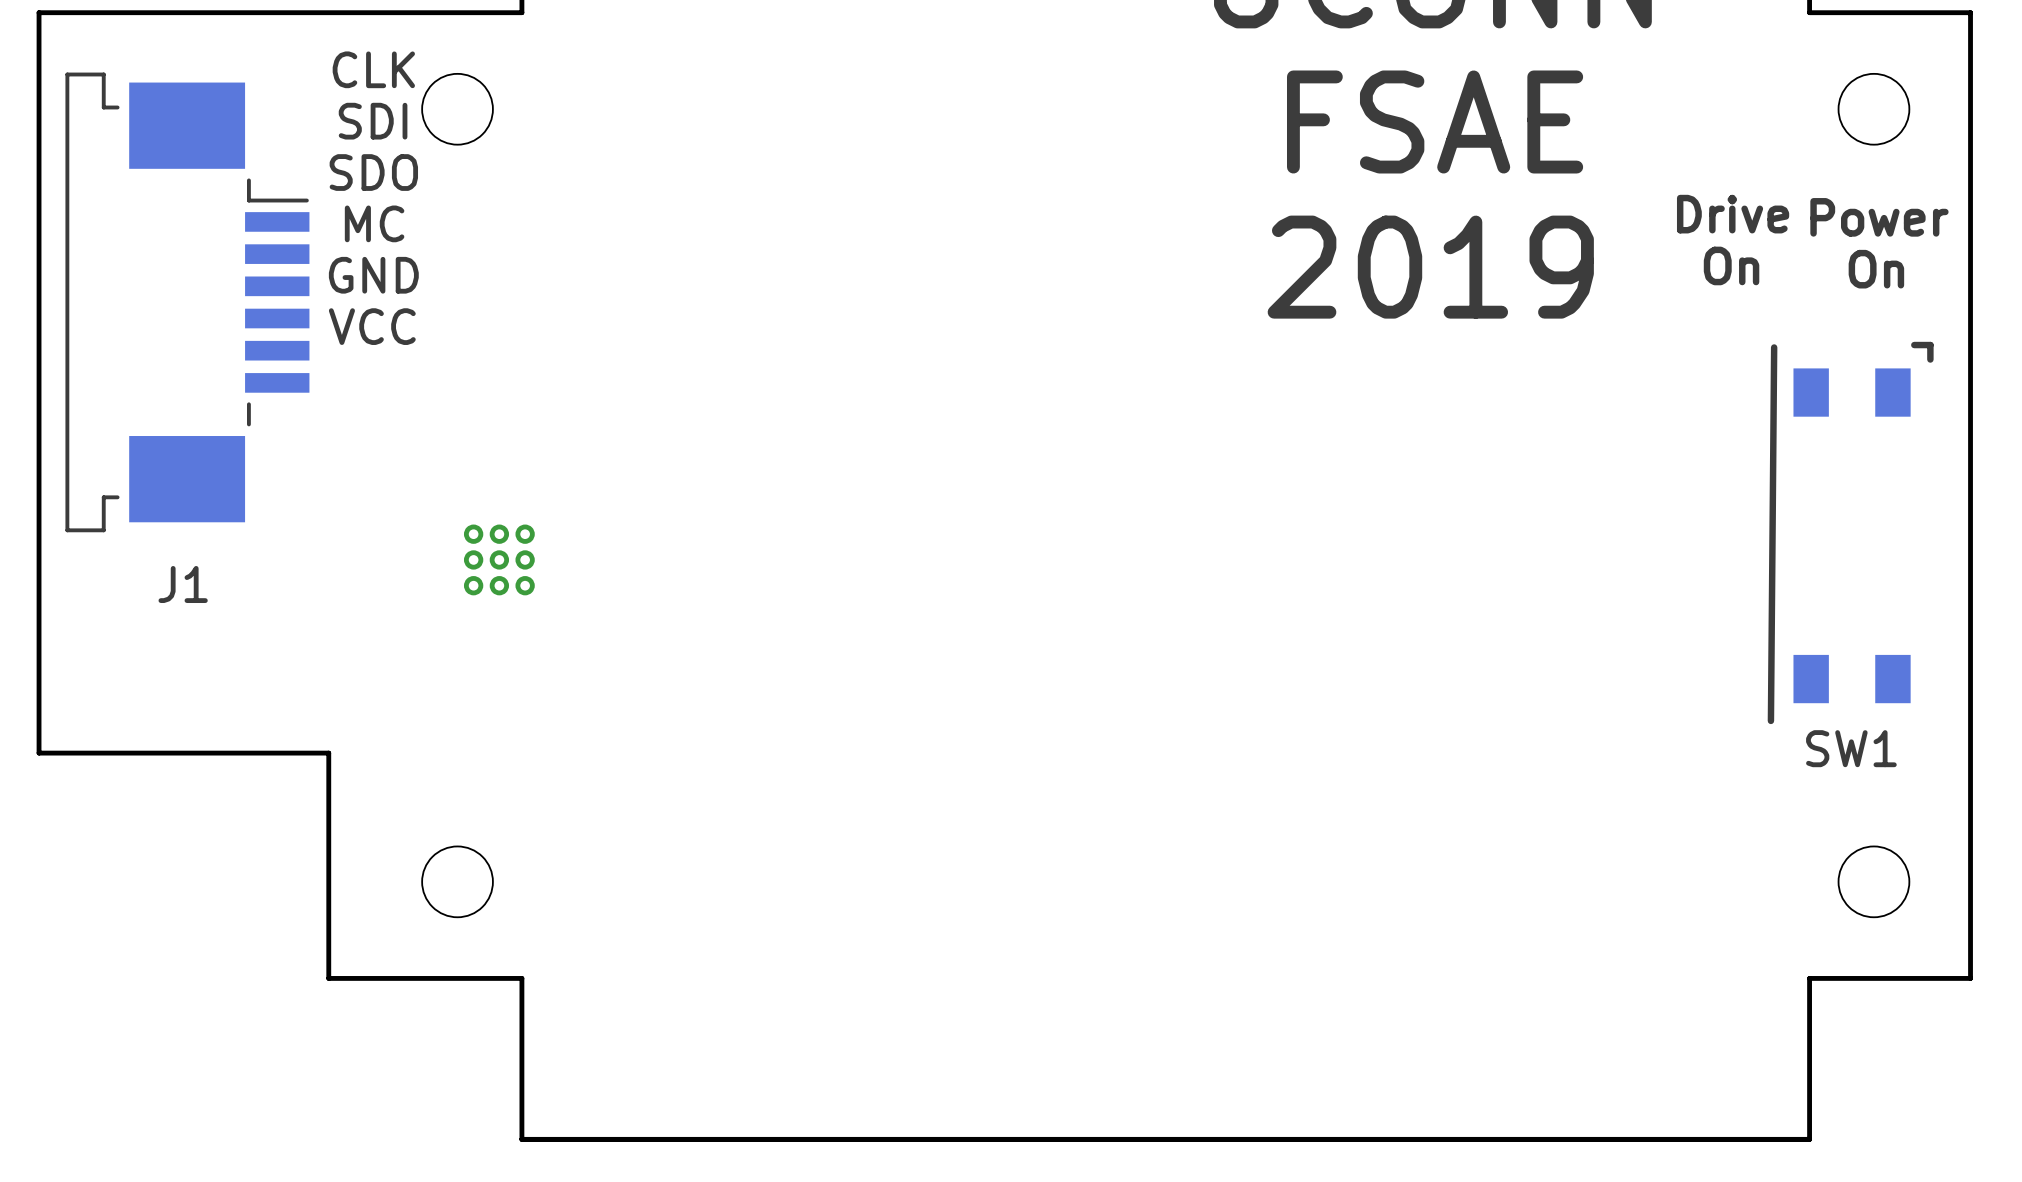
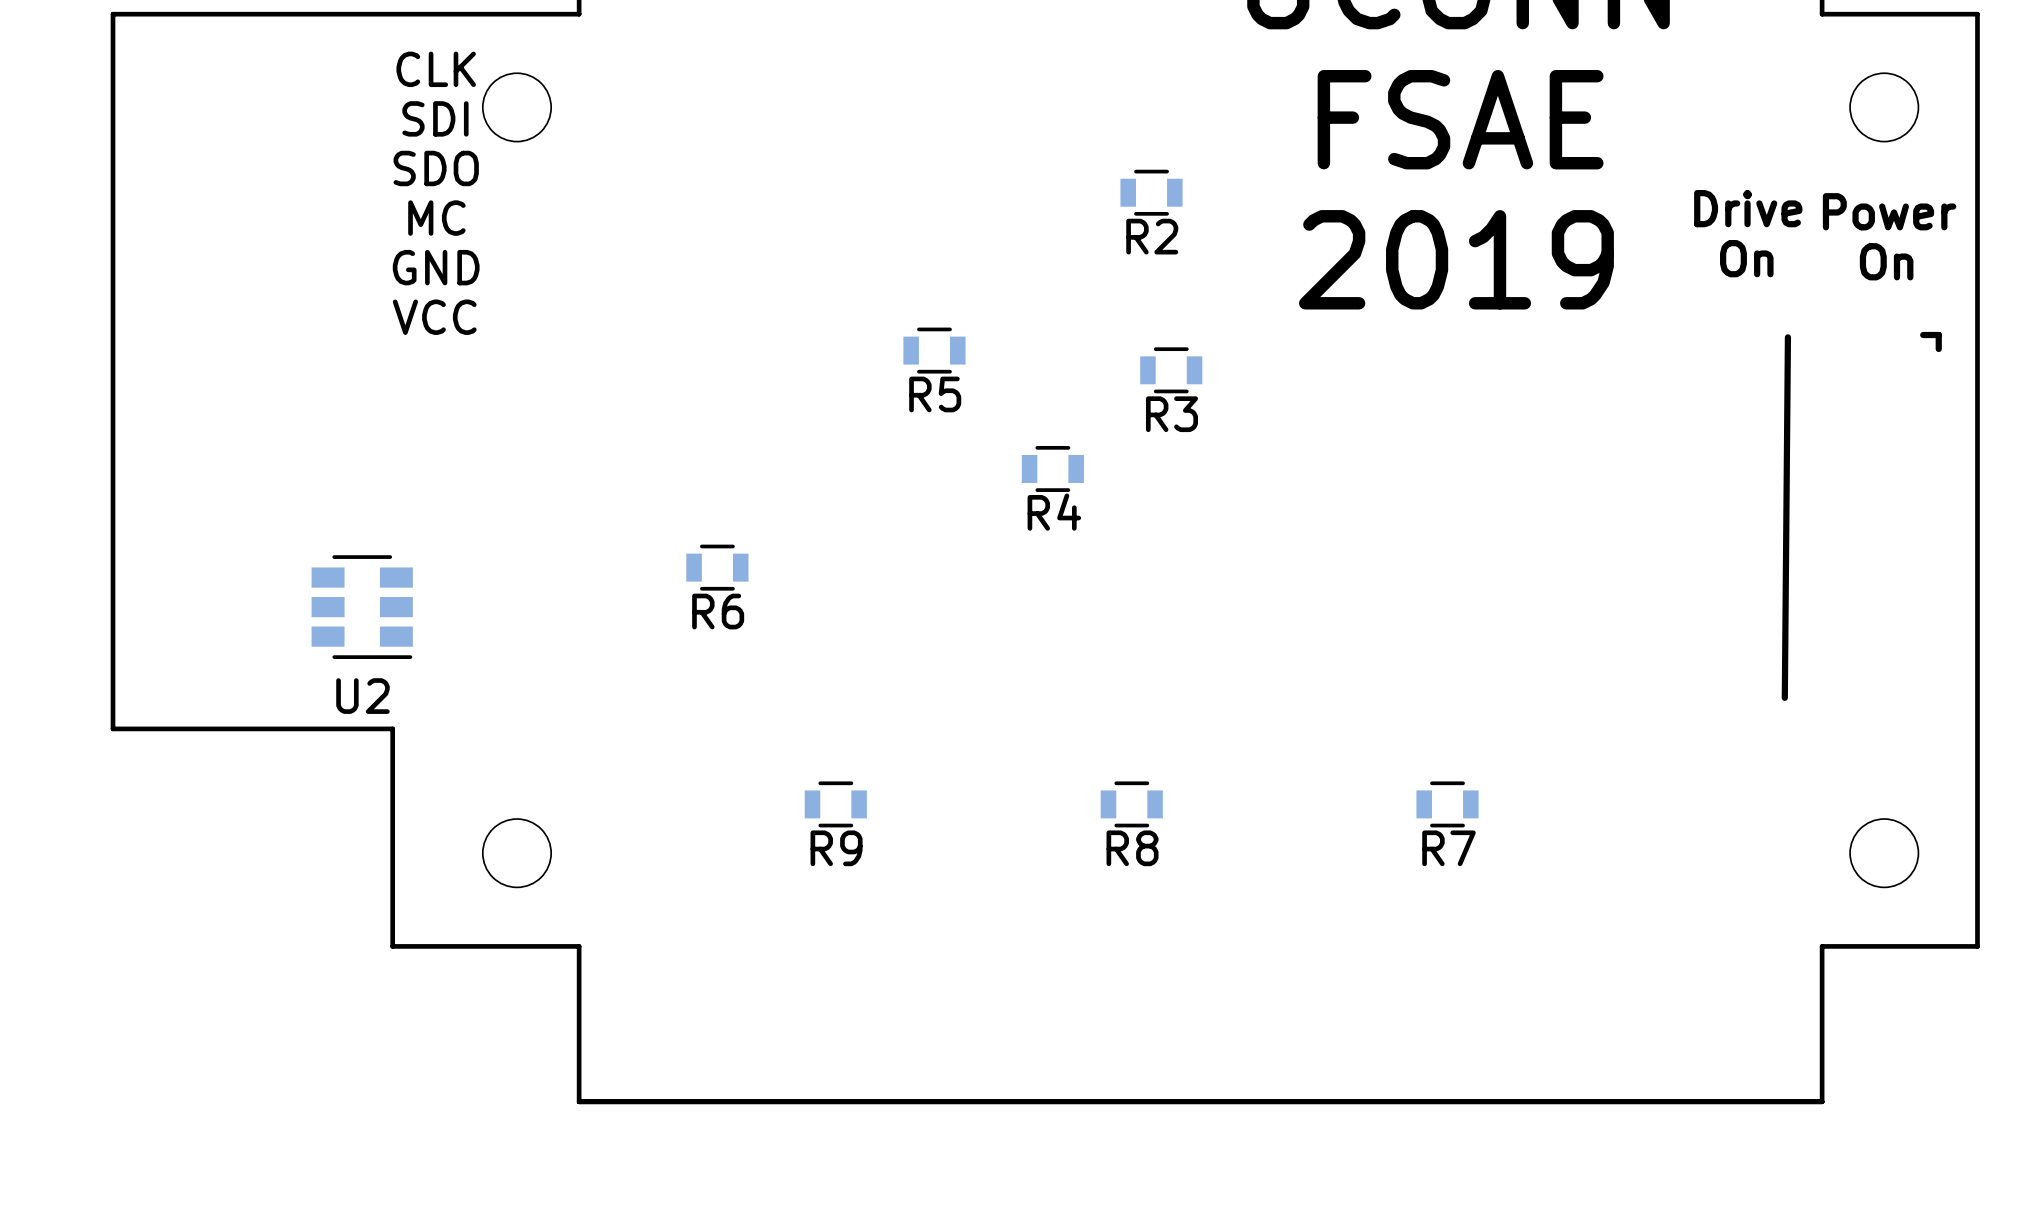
R2: none -> (1151, 192)
J1: (187, 302) -> none
R5: none -> (934, 350)
R3: none -> (1171, 370)
R4: none -> (1052, 468)
SW1: (1852, 535) -> none
part: (499, 559) -> none
R6: none -> (717, 567)
U2: none -> (362, 607)
R9: none -> (835, 804)
R8: none -> (1131, 804)
R7: none -> (1447, 804)

